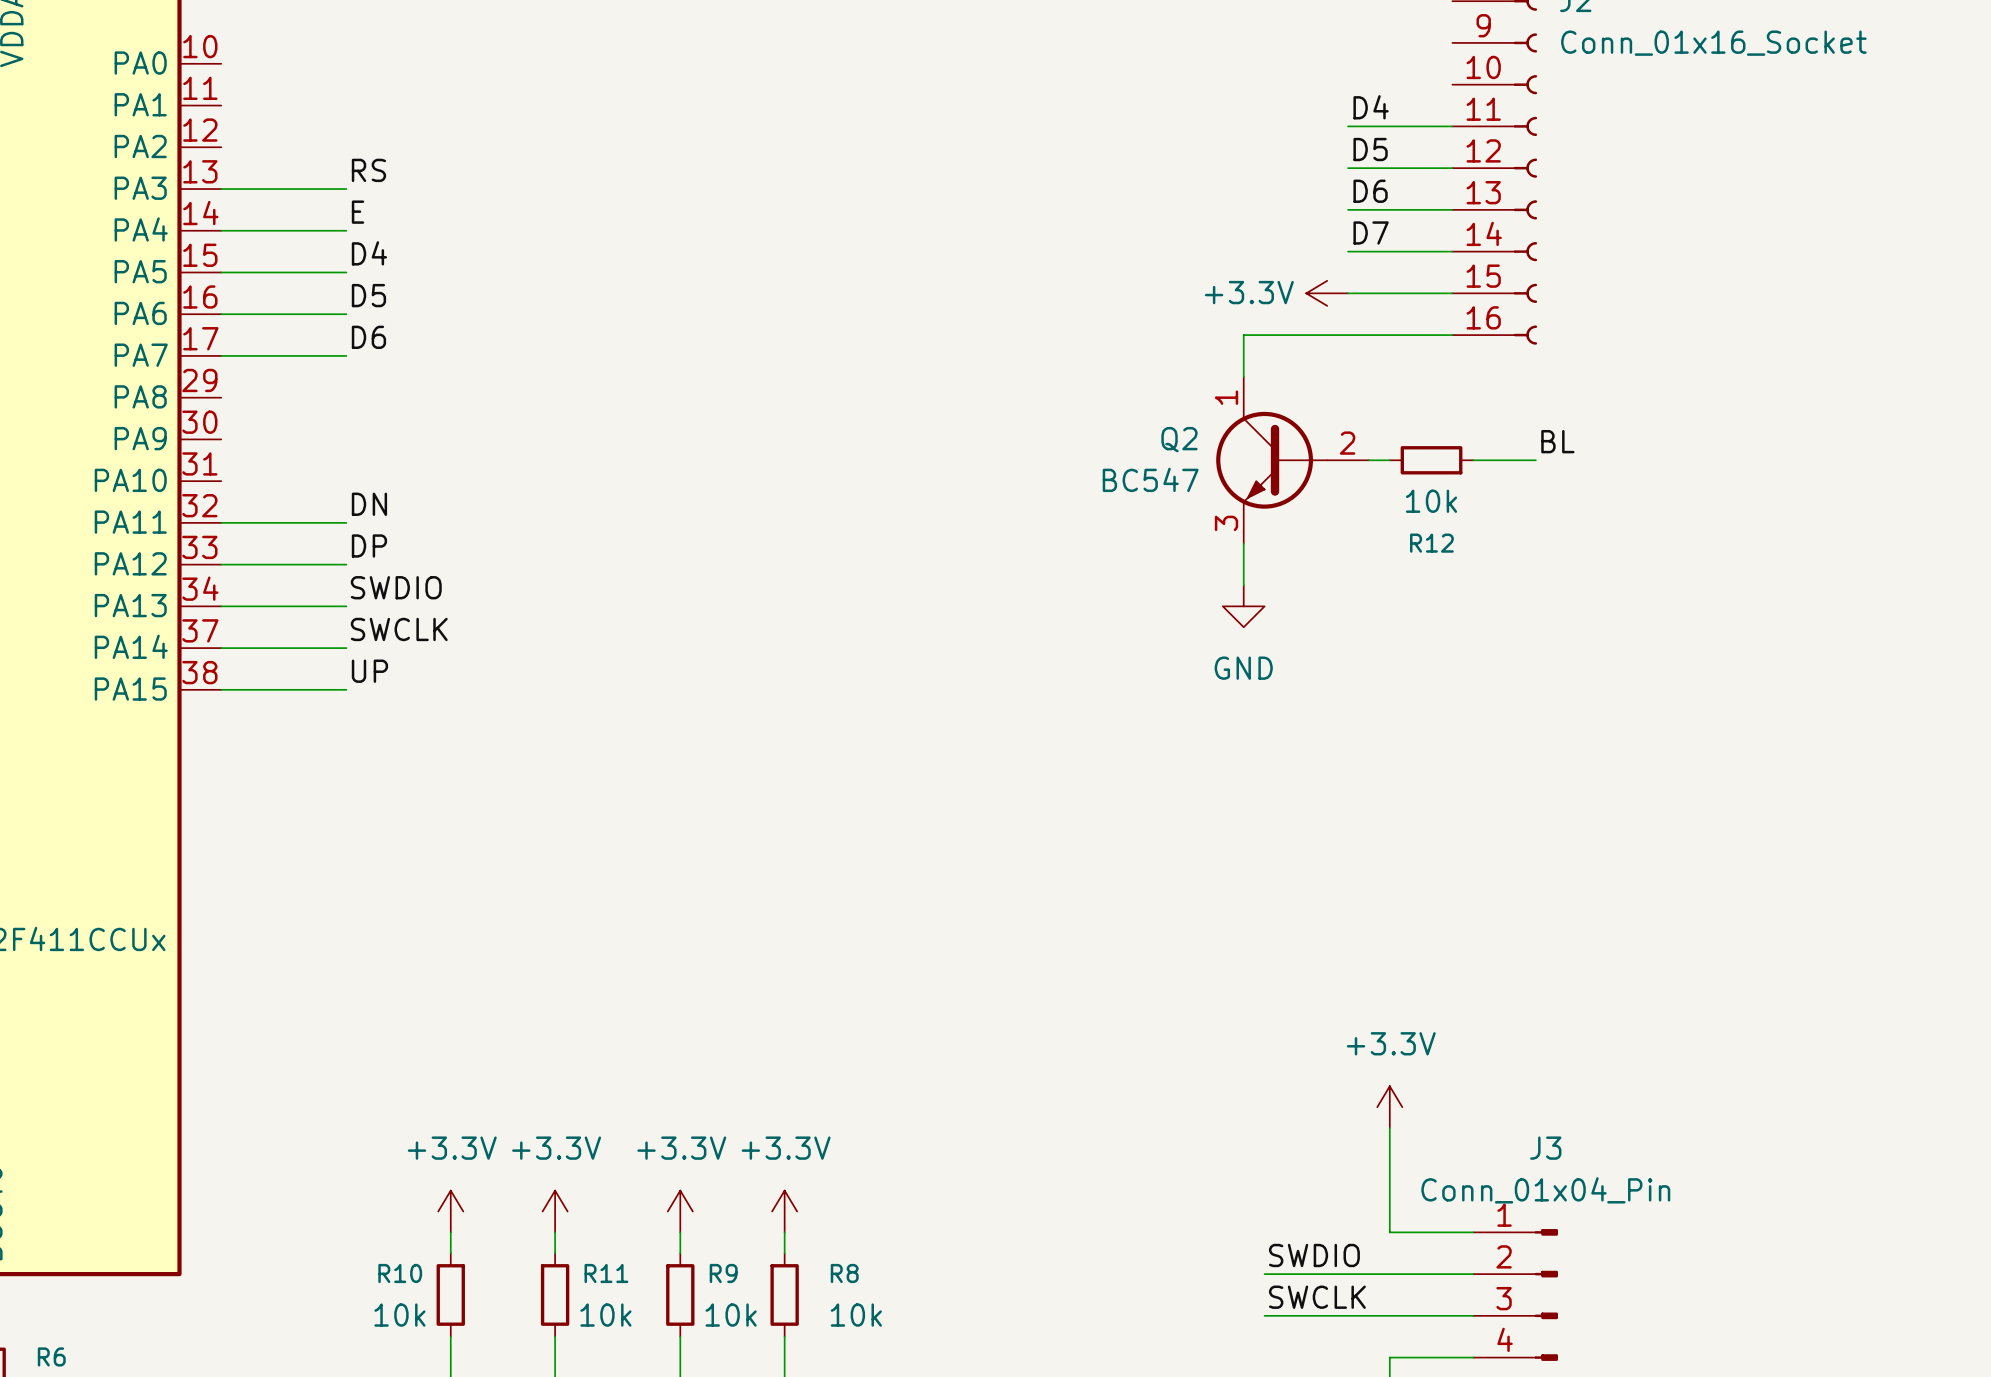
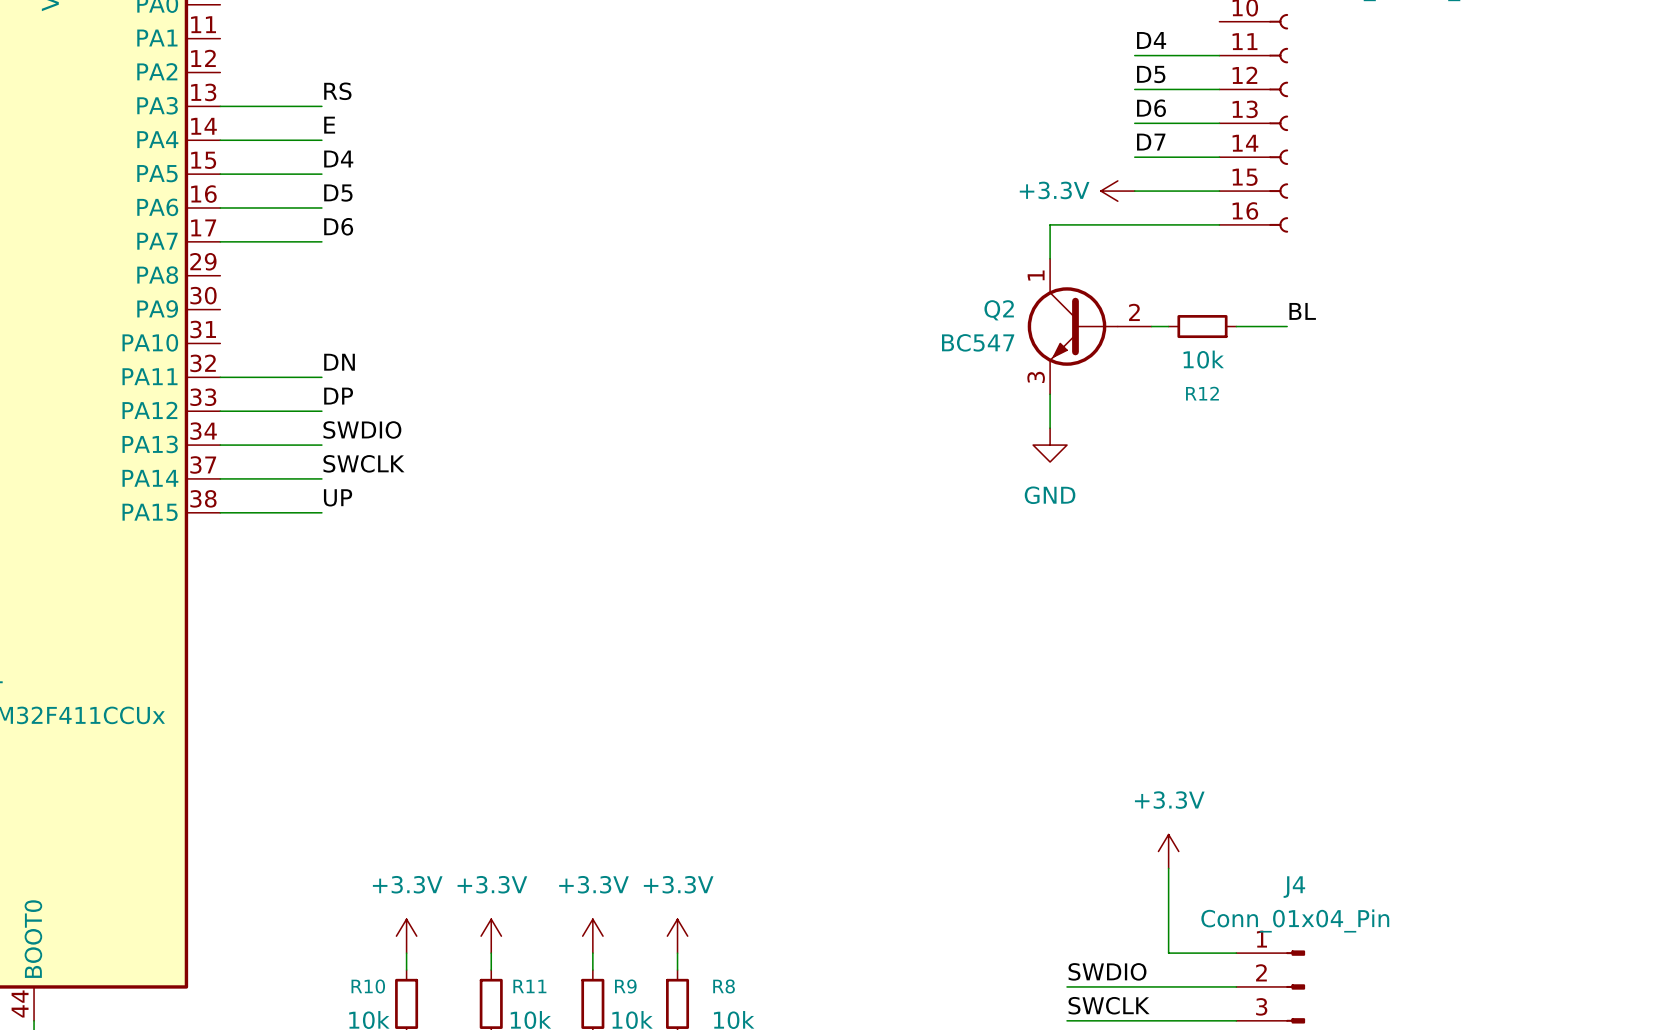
J3 name: J3 (1545, 1148) -> J4 (1294, 887)

